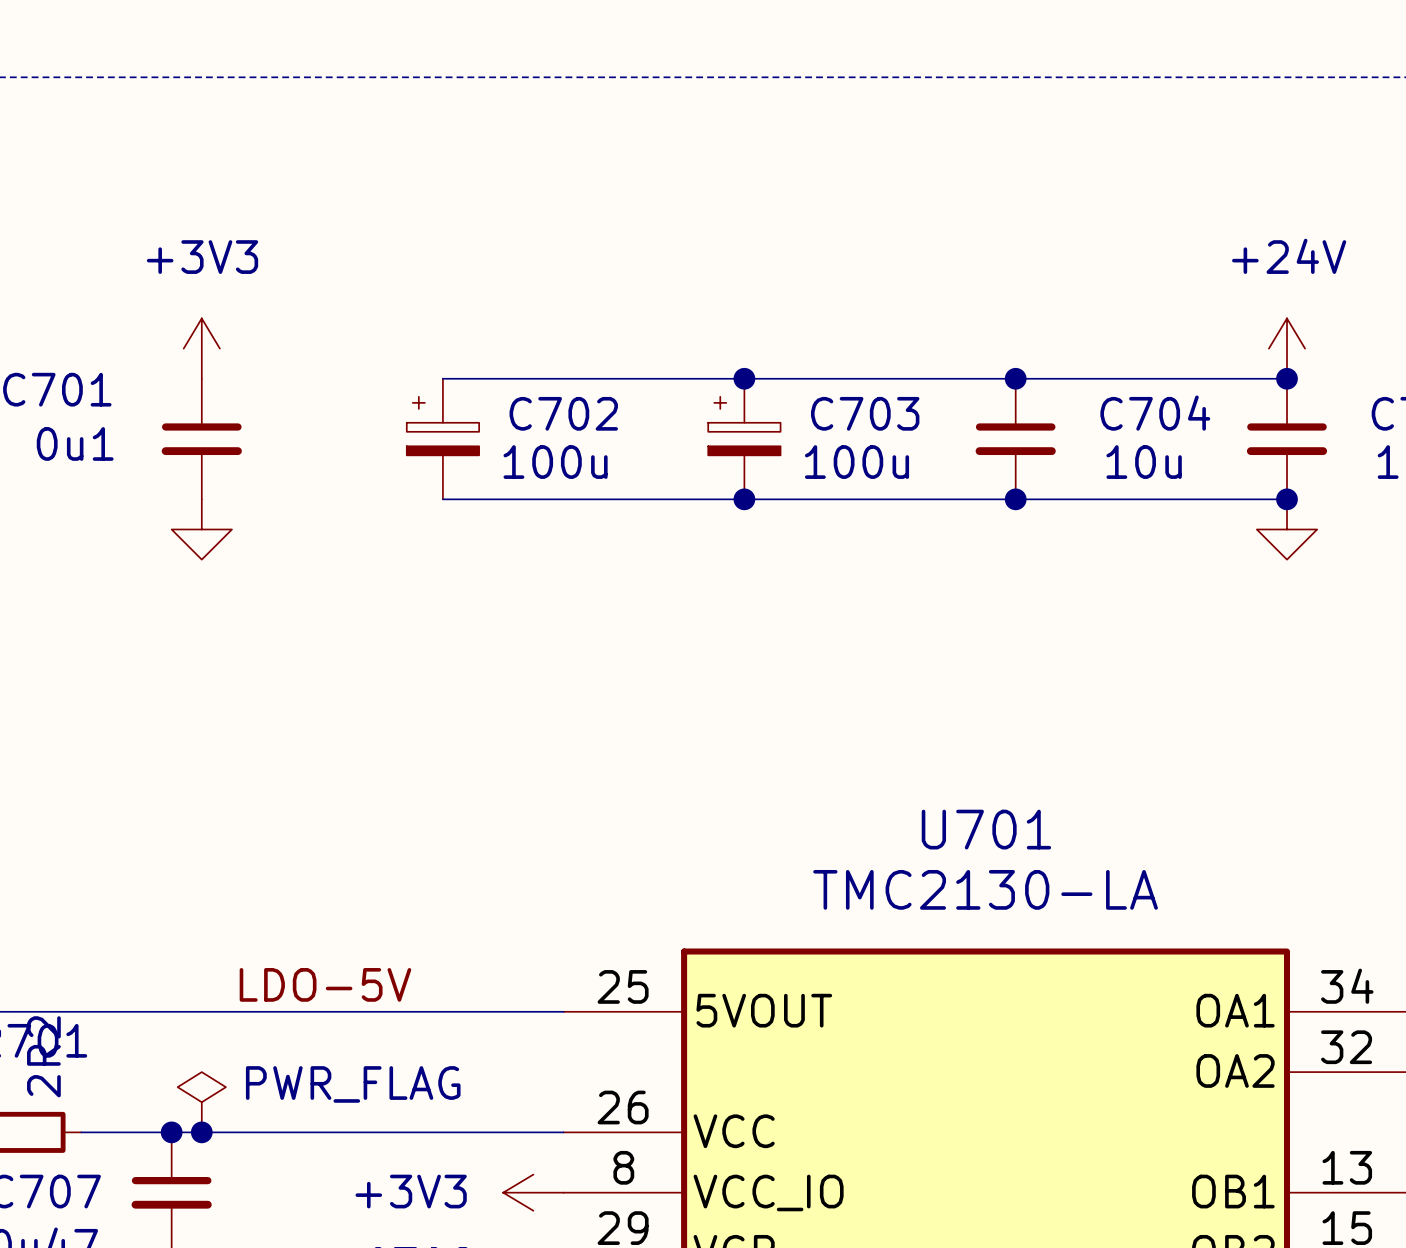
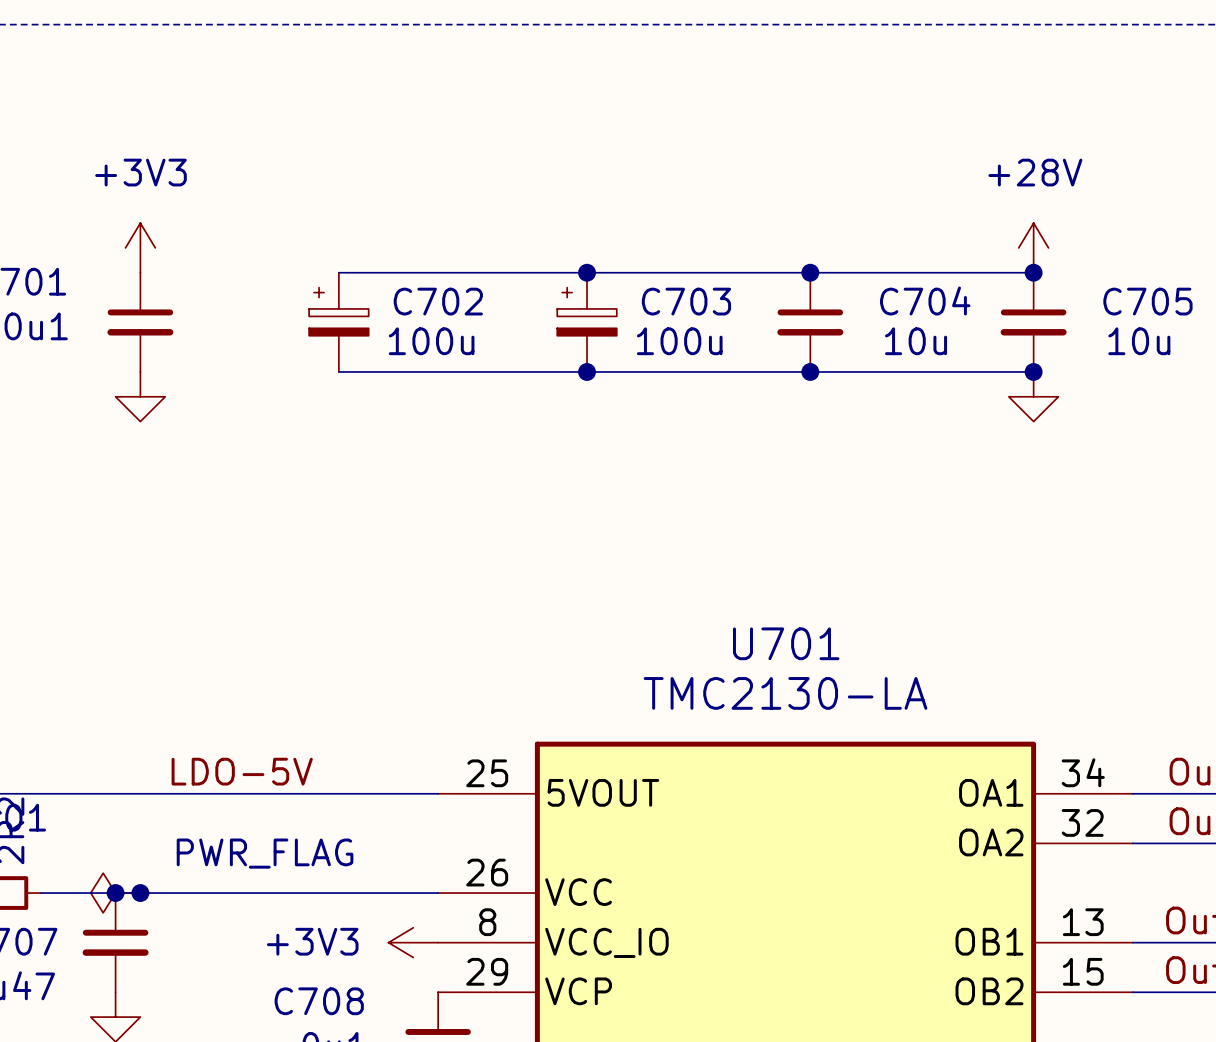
power symbol: +24V (1287, 348) -> +28V (1033, 247)
power symbol rotation: 0° (201, 1102) -> 90° counterclockwise (115, 893)
power symbol position: PWR_FLAG (201, 1102) -> PWR_FLAG (115, 893)

